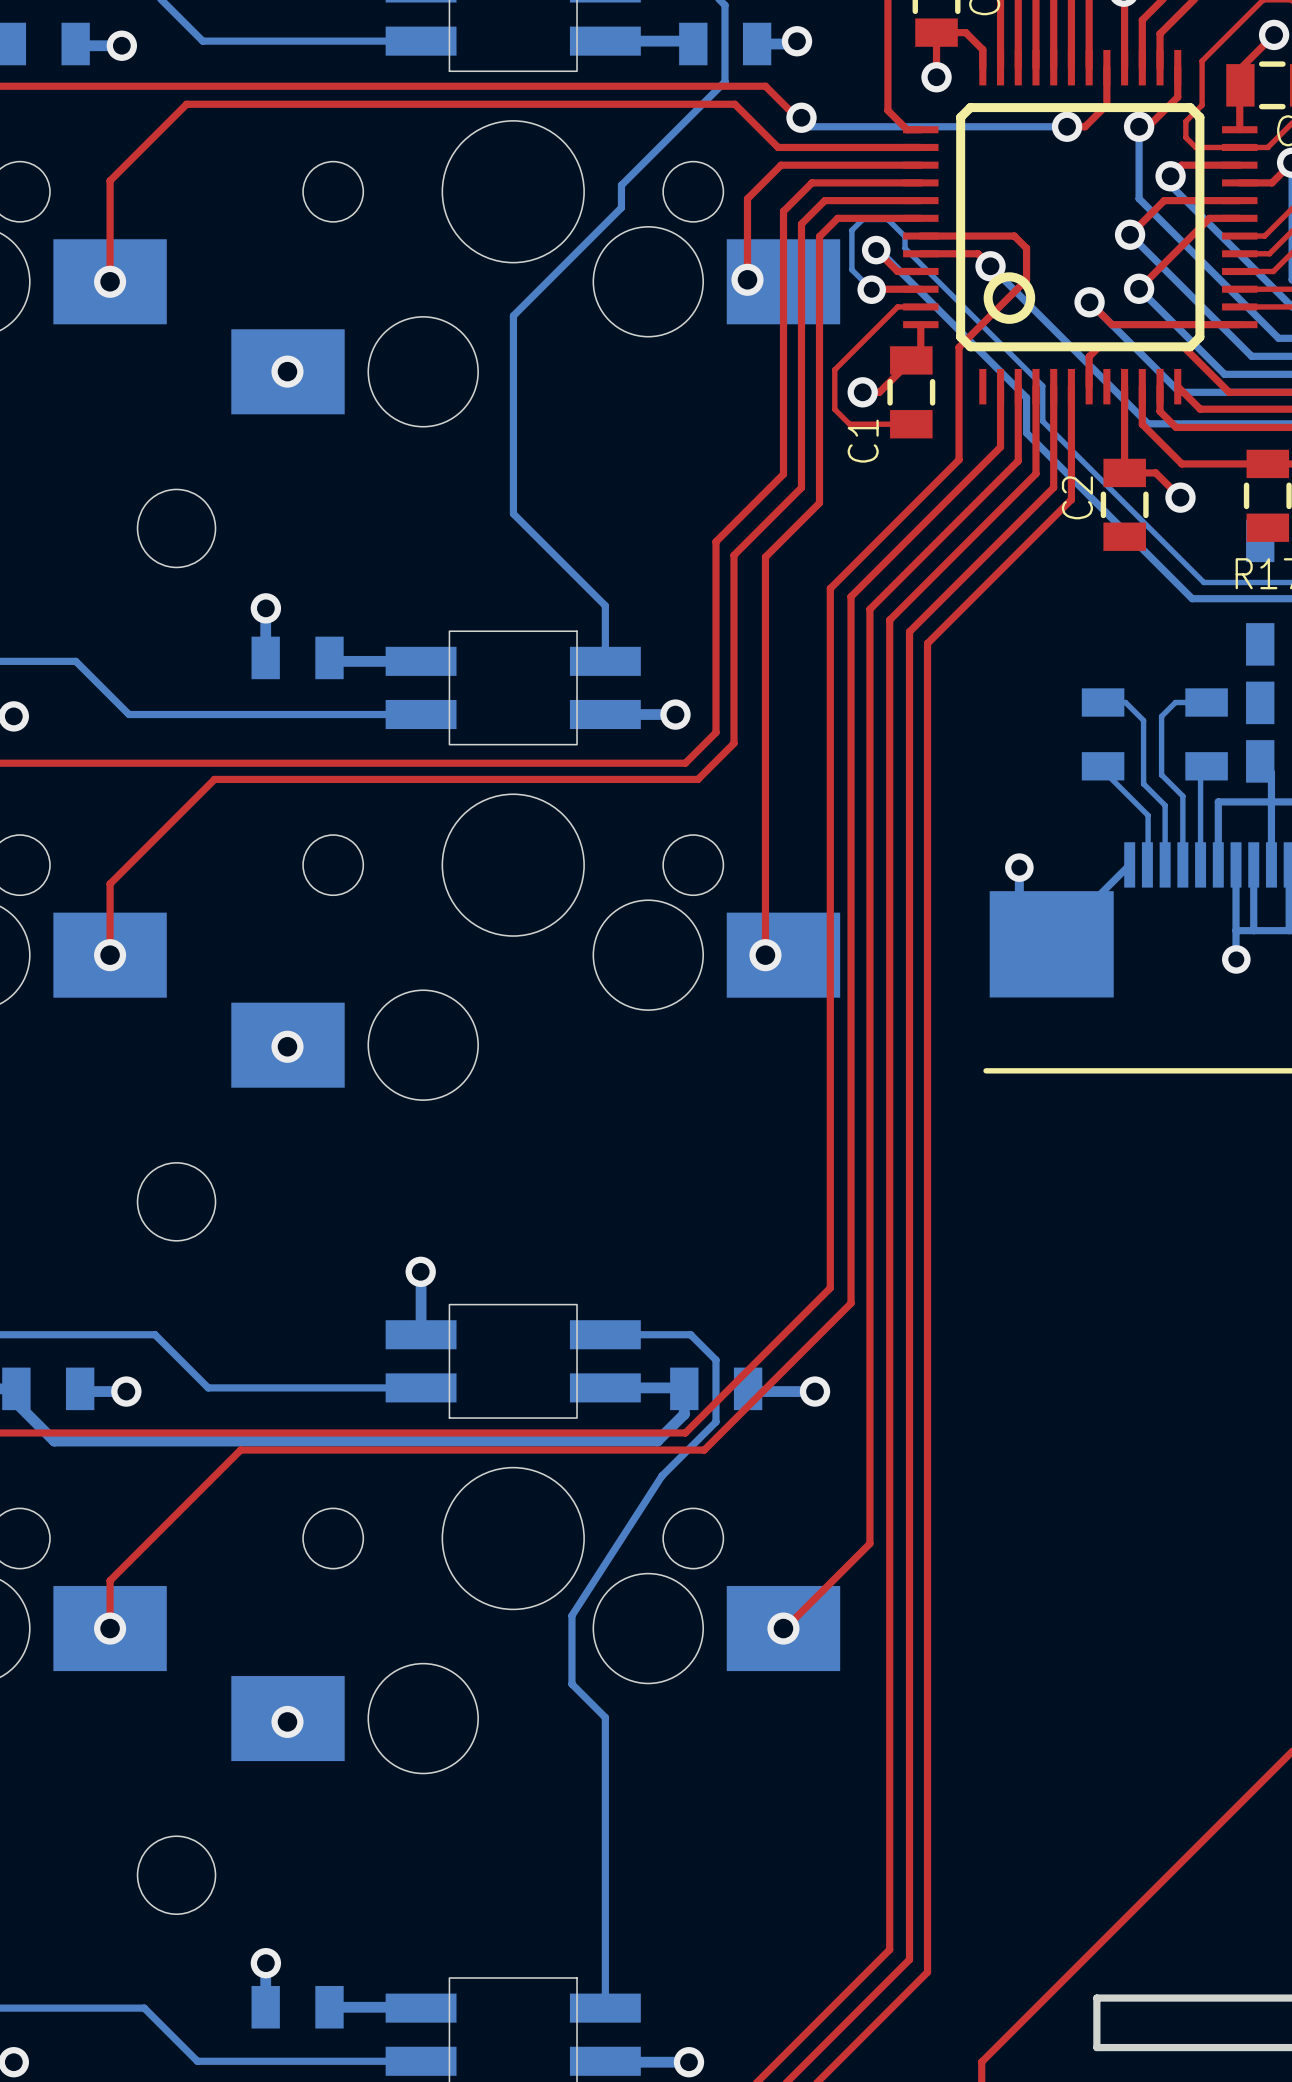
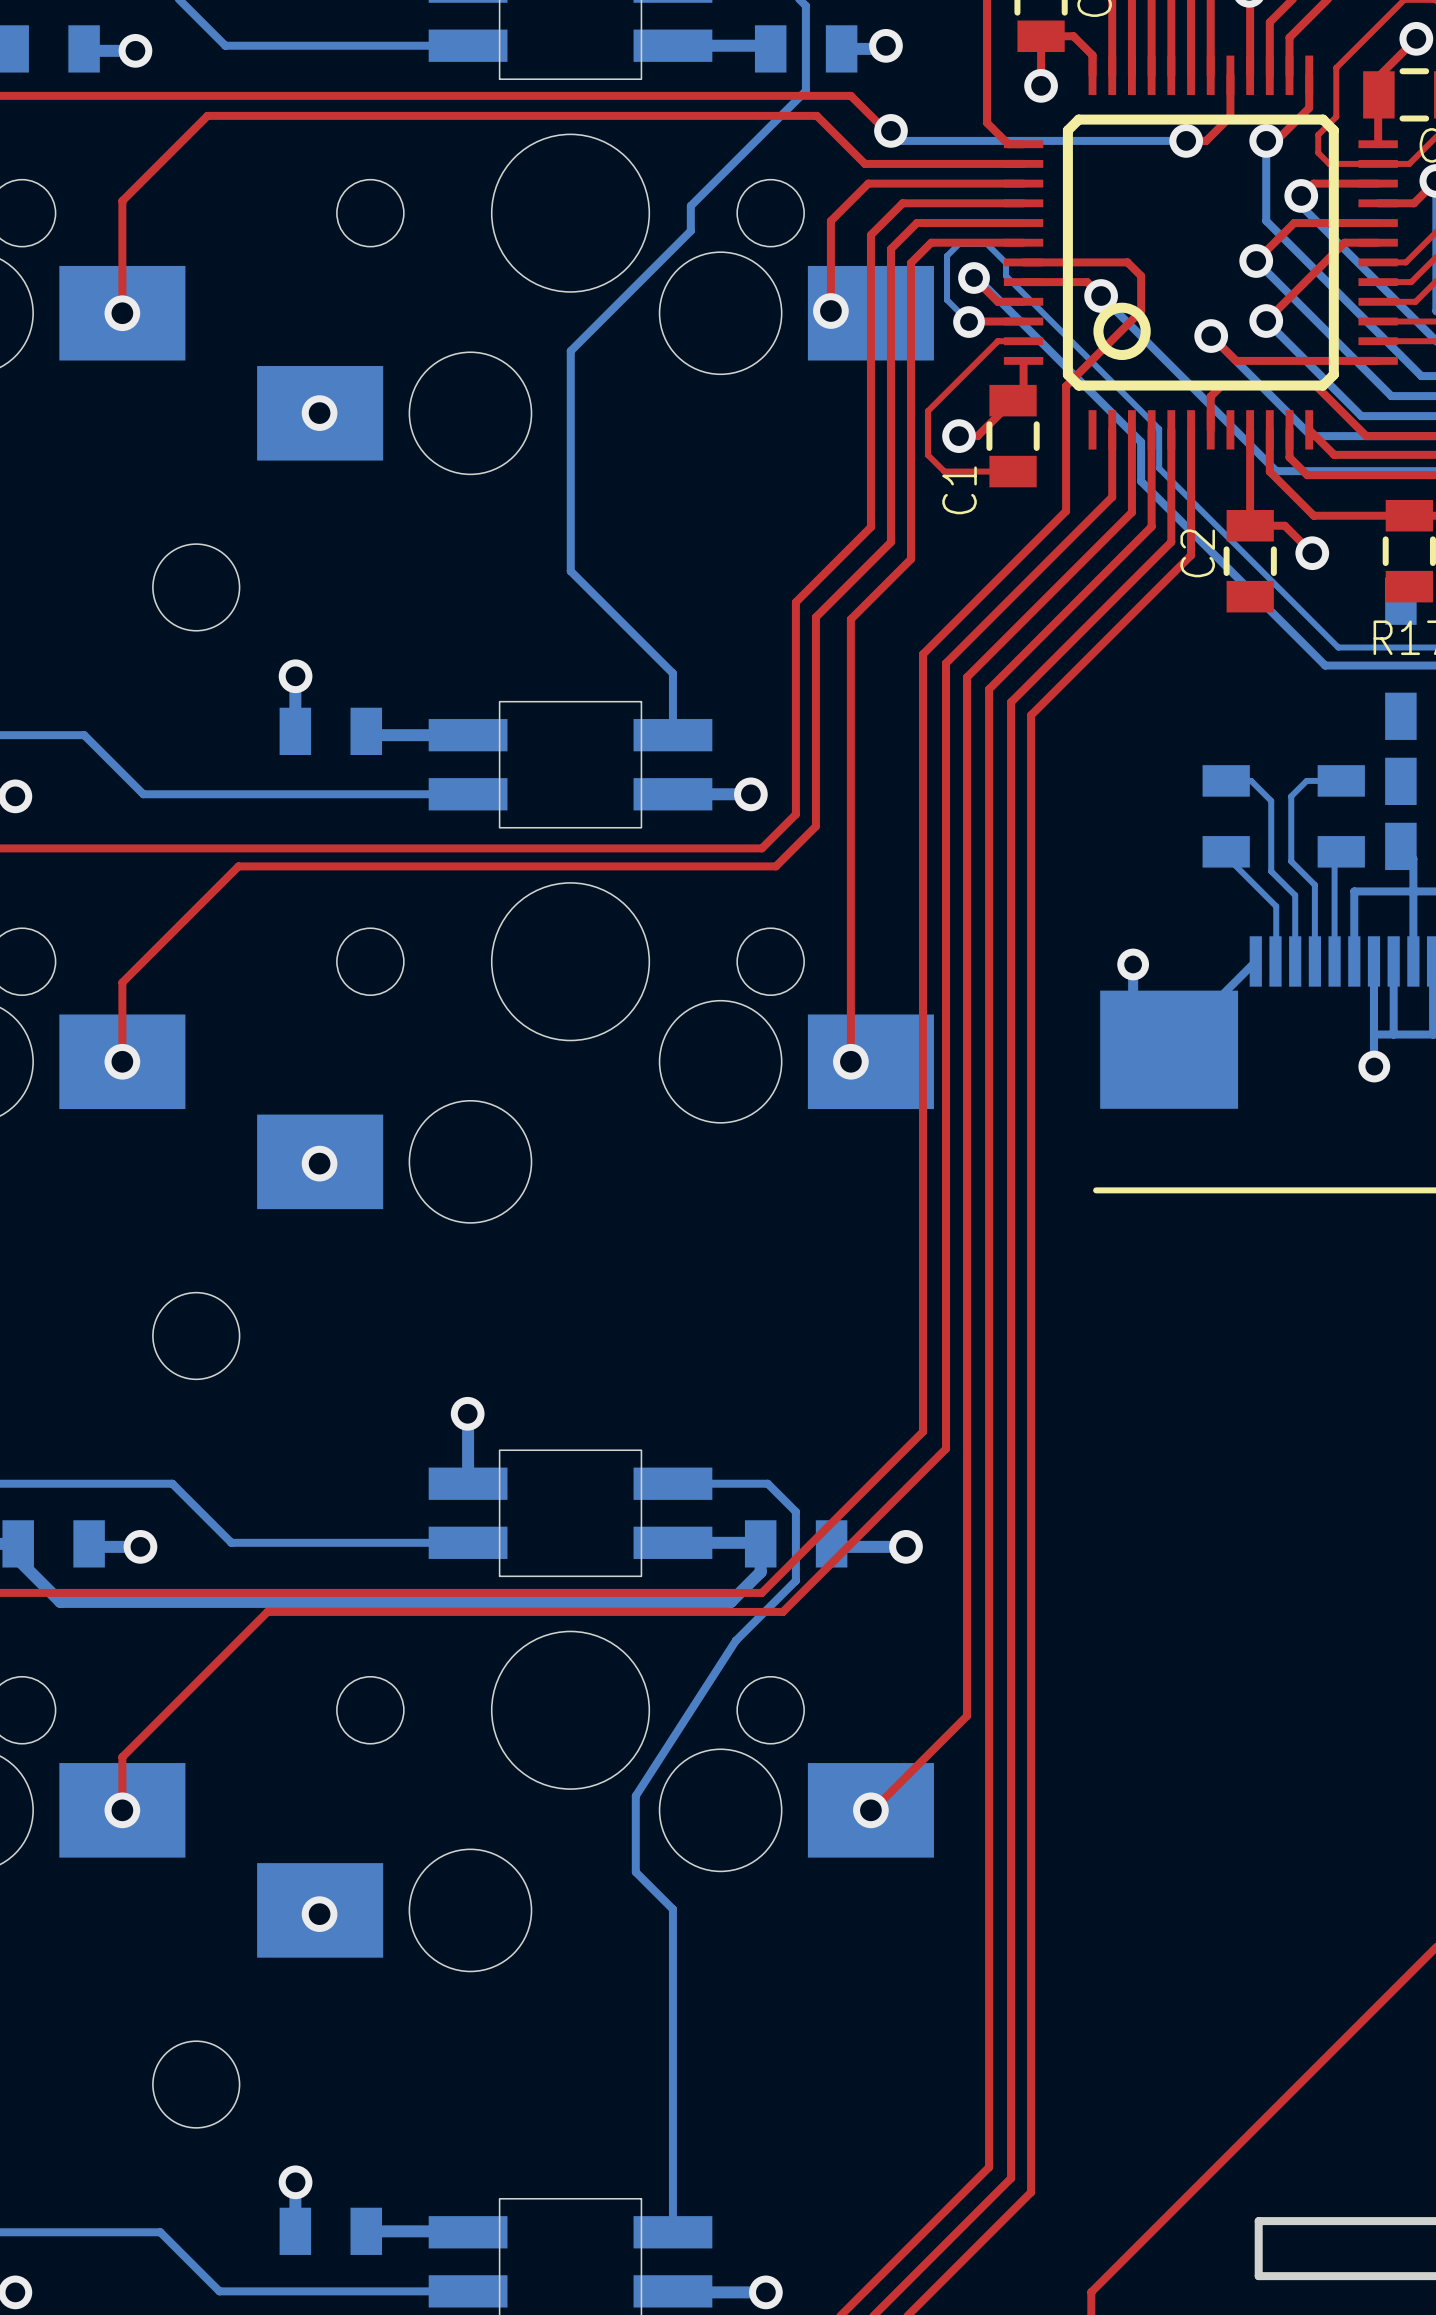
board edge: (1132, 1998) (1096, 1998) (1096, 2047) (1132, 2047) -> (1258, 2221) (1258, 2276)

